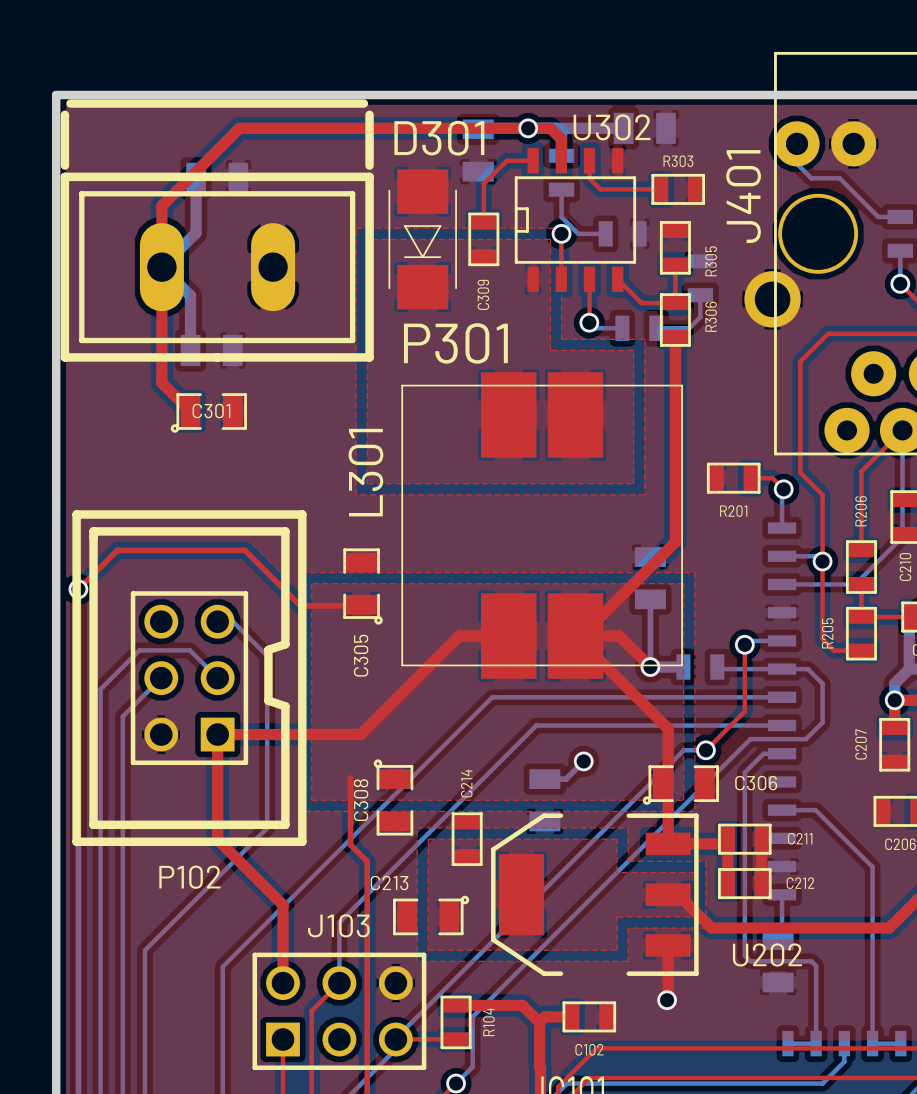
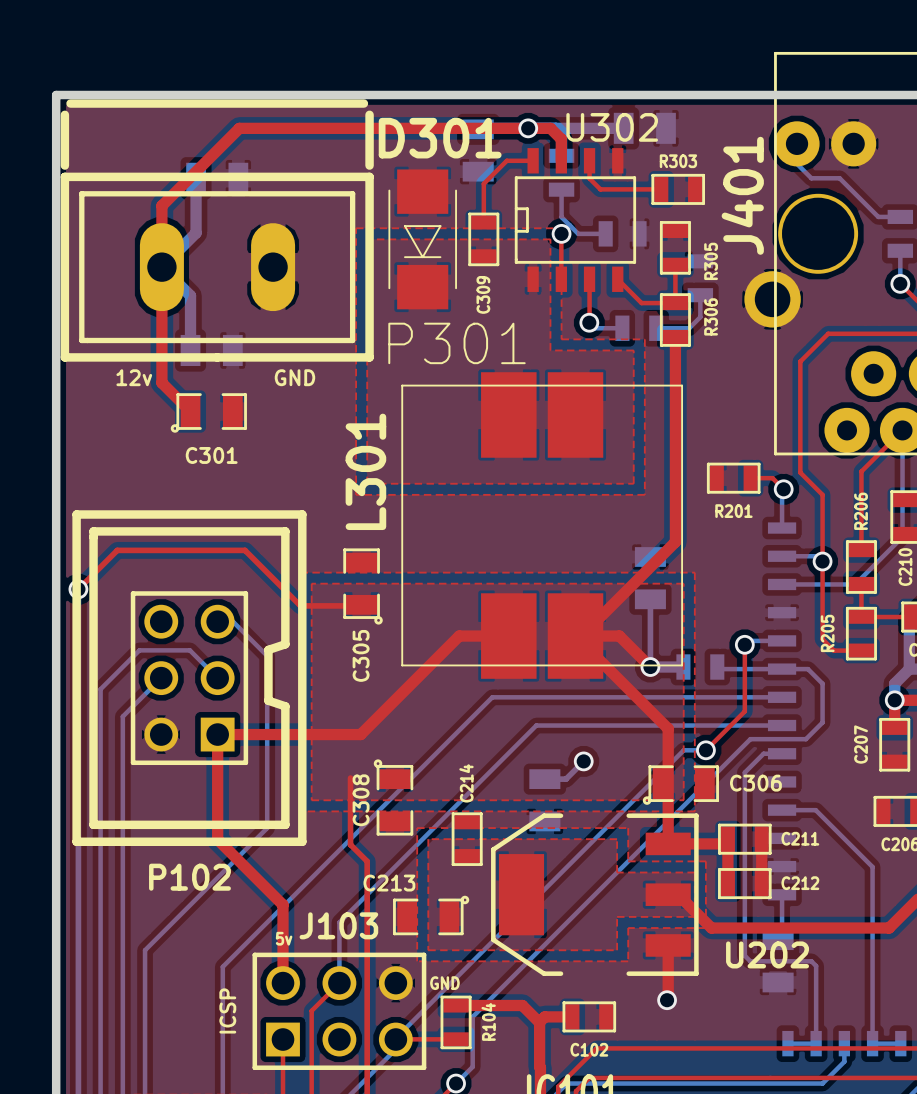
text: none -> 12v (134, 377)
text: none -> GND (294, 377)
C301 name position: C301 (211, 411) -> C301 (211, 455)
text: none -> 5v (284, 938)
text: none -> GND (444, 983)
text: none -> ICSP (227, 1010)

